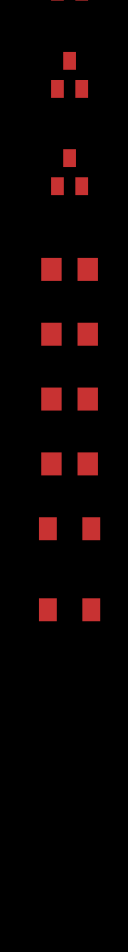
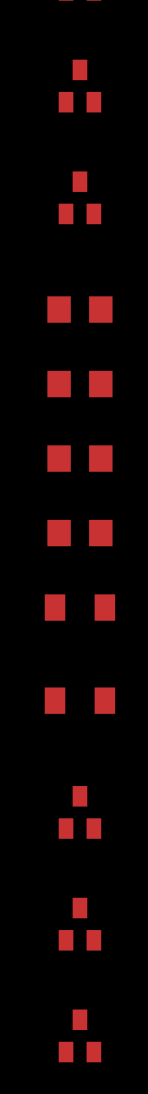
part: none -> (79, 812)
part: none -> (79, 924)
part: none -> (79, 1035)

